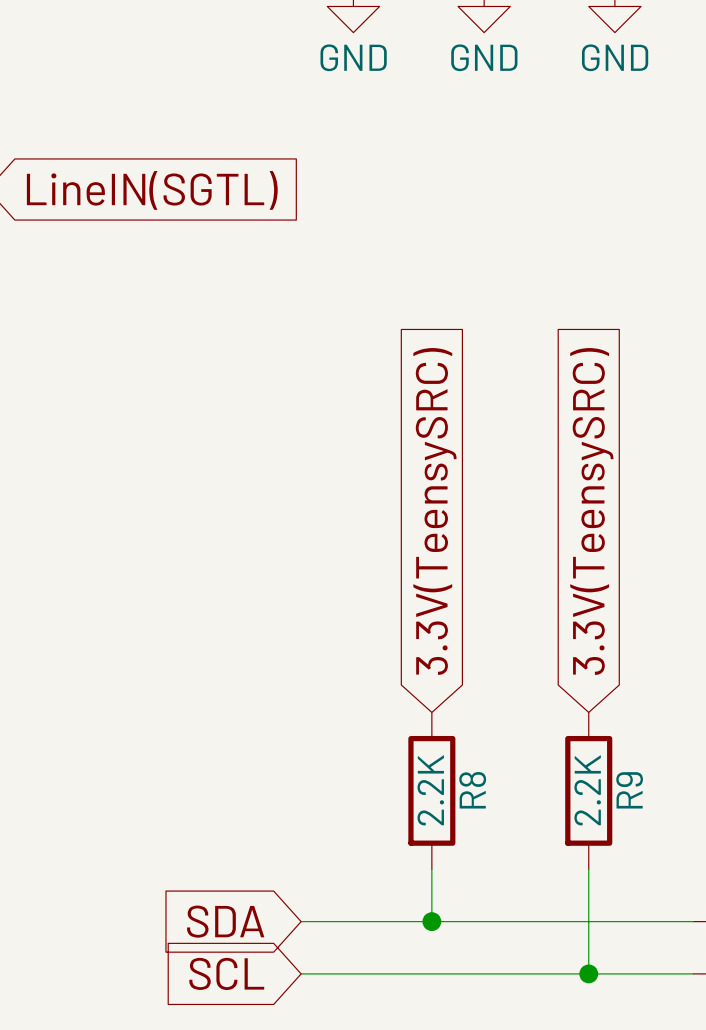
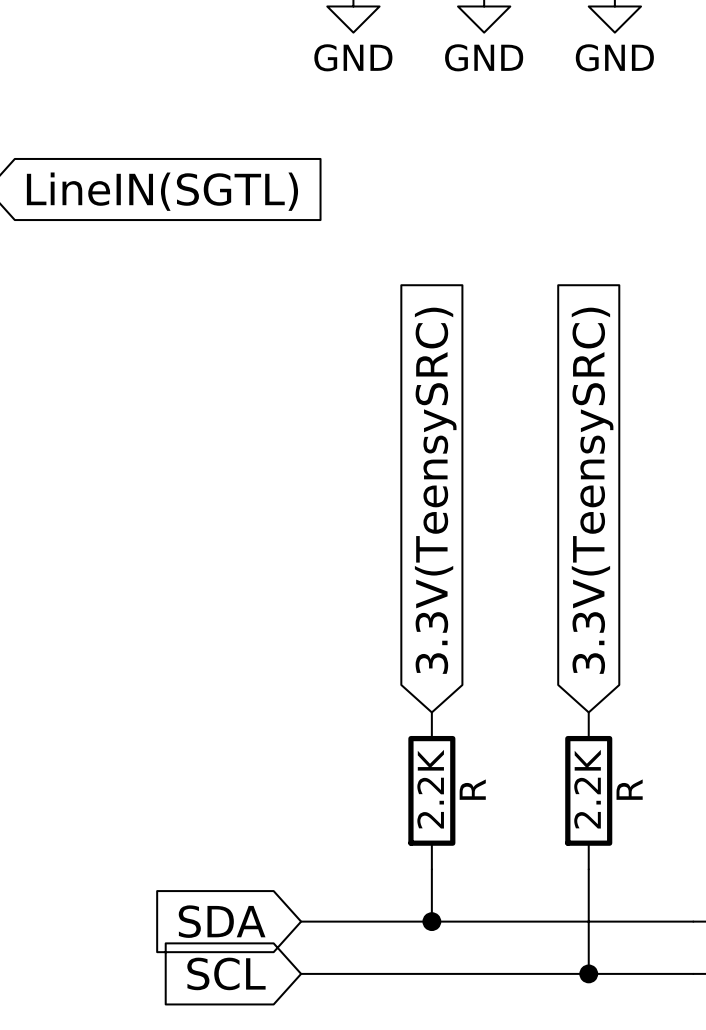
R8 name: R8 (472, 790) -> R (472, 789)
R9 name: R9 (629, 790) -> R (629, 789)

